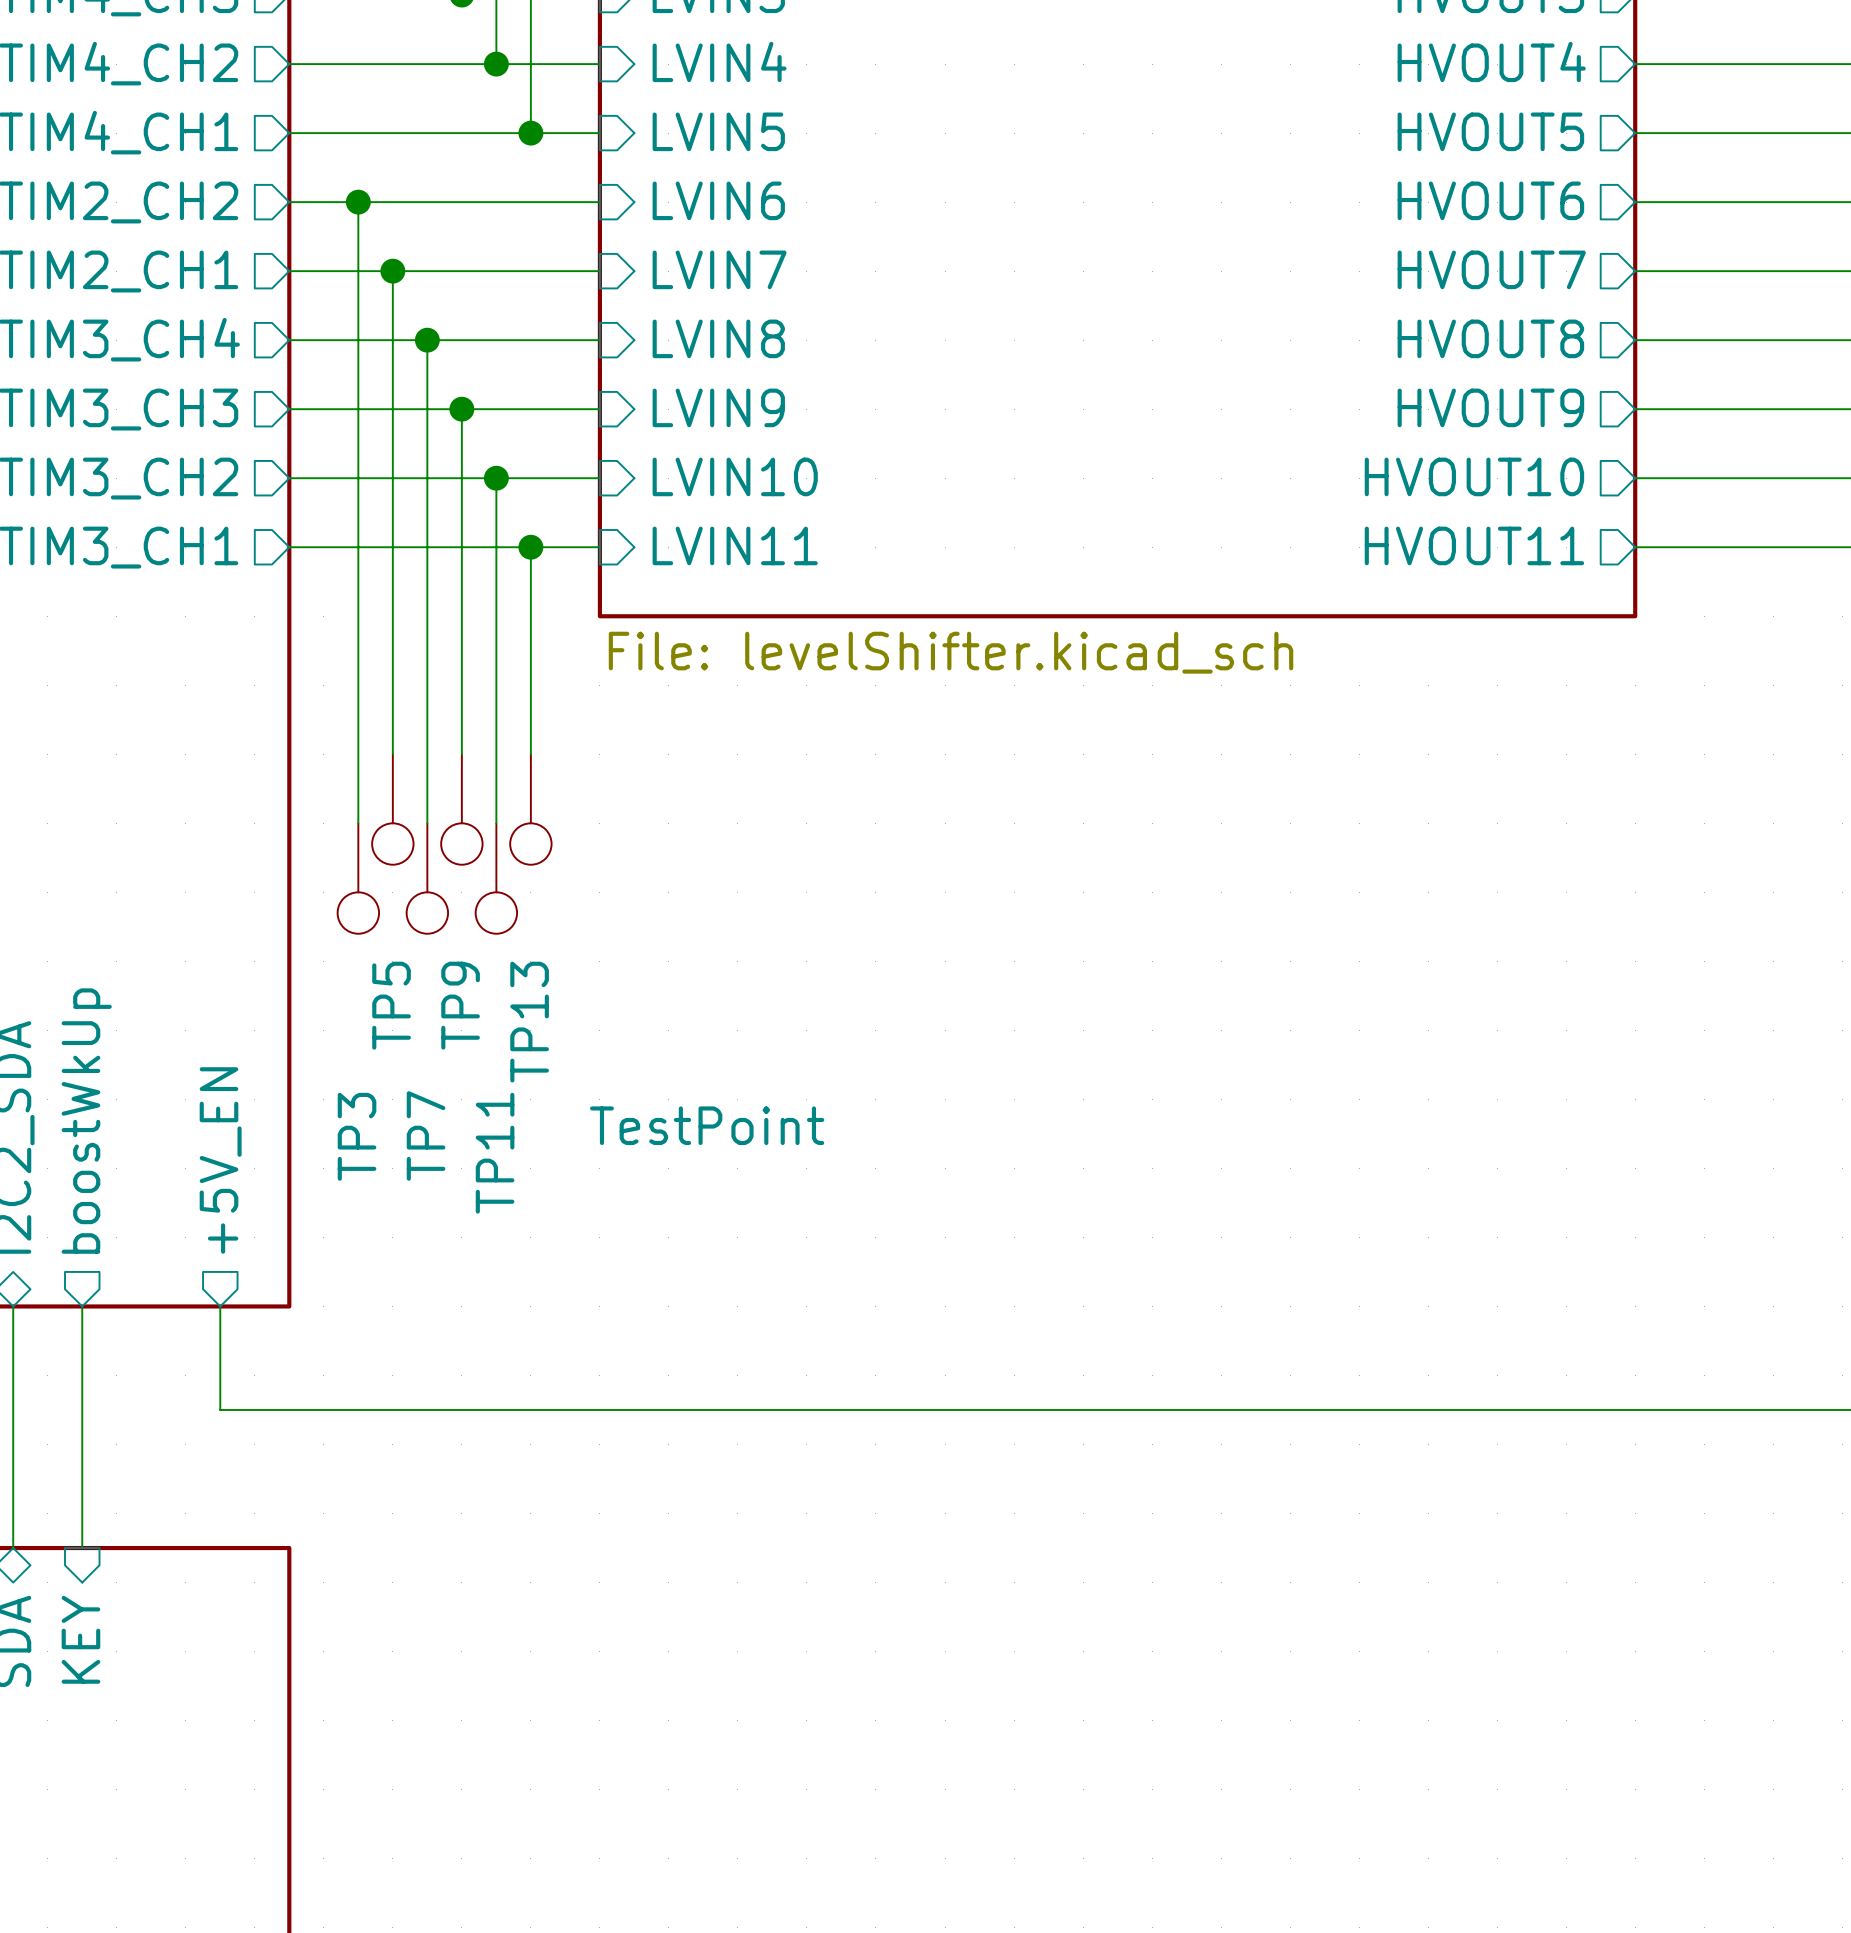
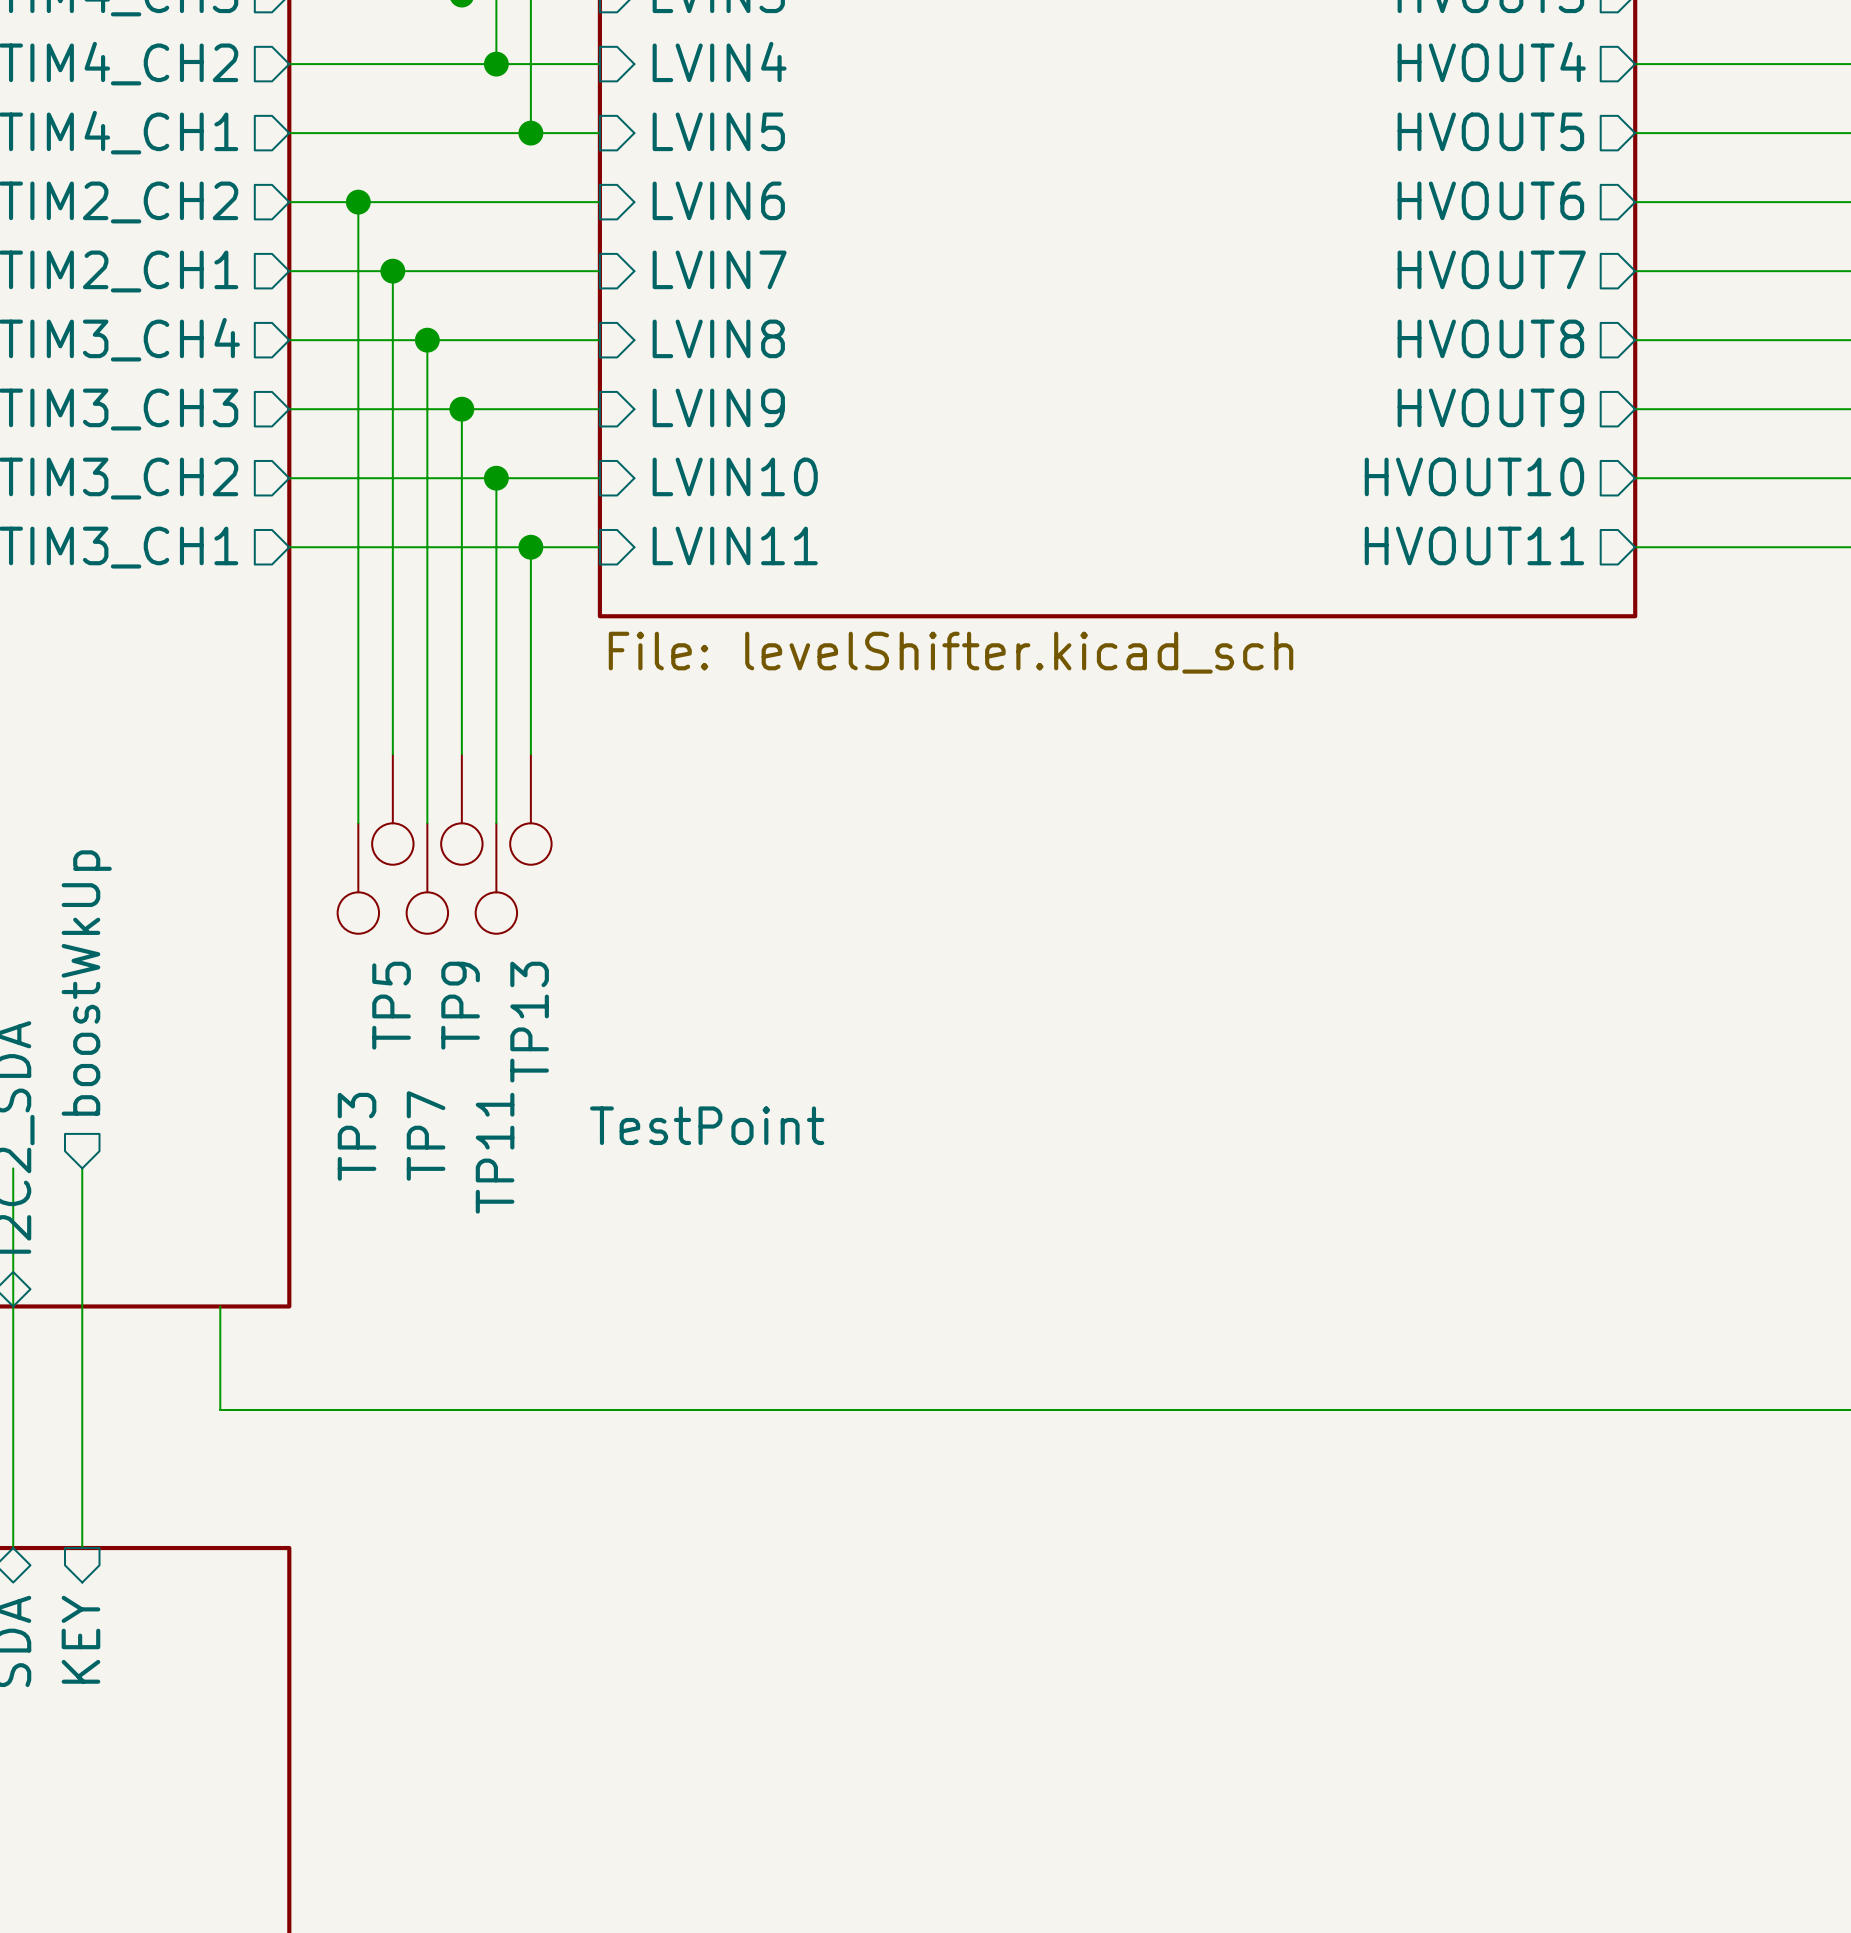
sheet pin position: boostWkUp (86, 1121) -> boostWkUp (86, 983)
sheet pin: +5V_EN (220, 1160) -> none
wire: none -> (13, 1168) (13, 1306)
wire: none -> (82, 1168) (82, 1306)

